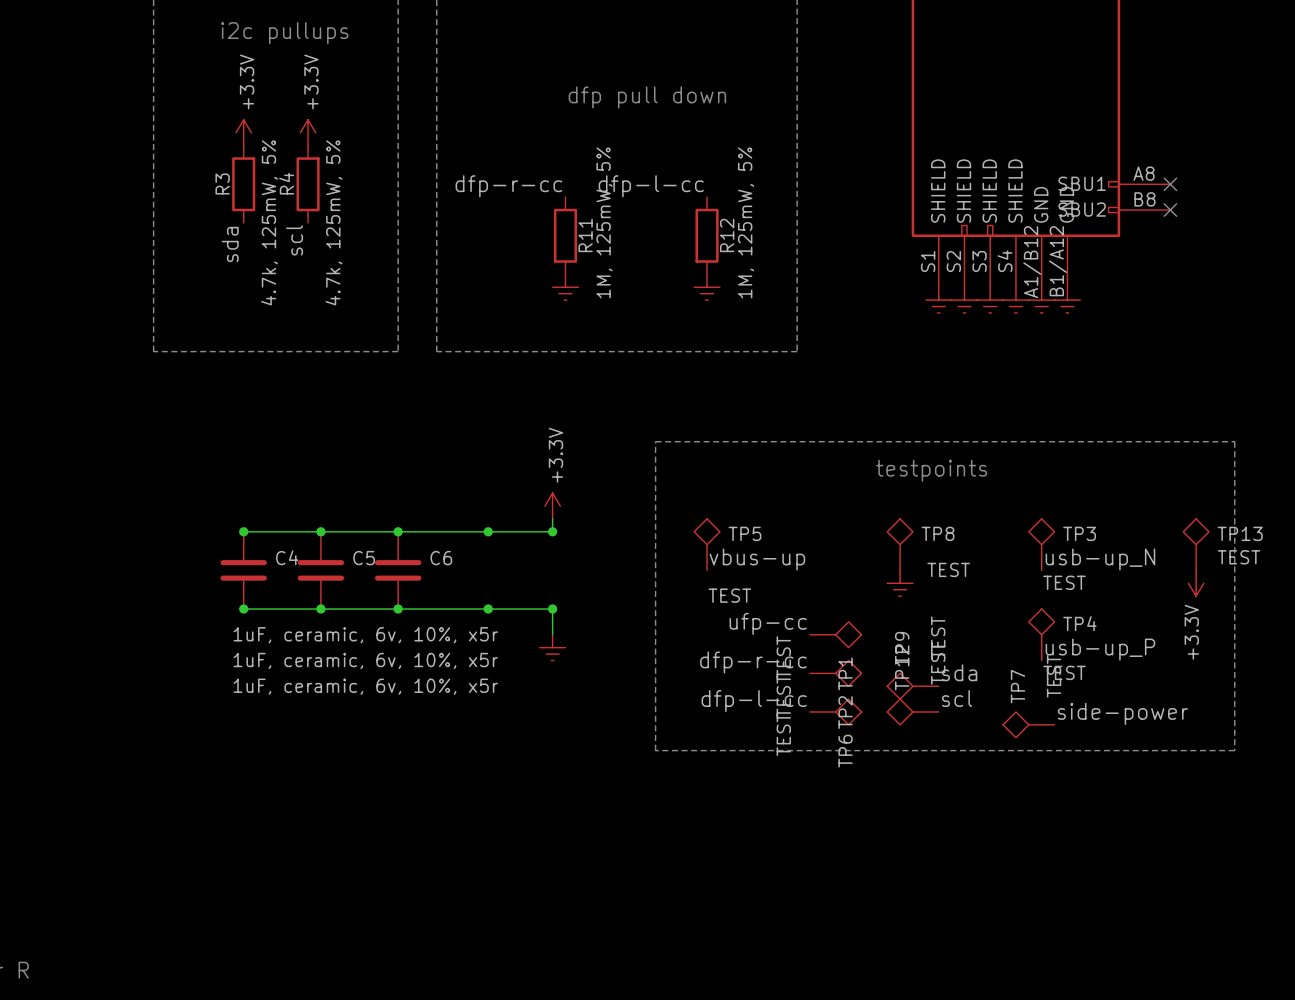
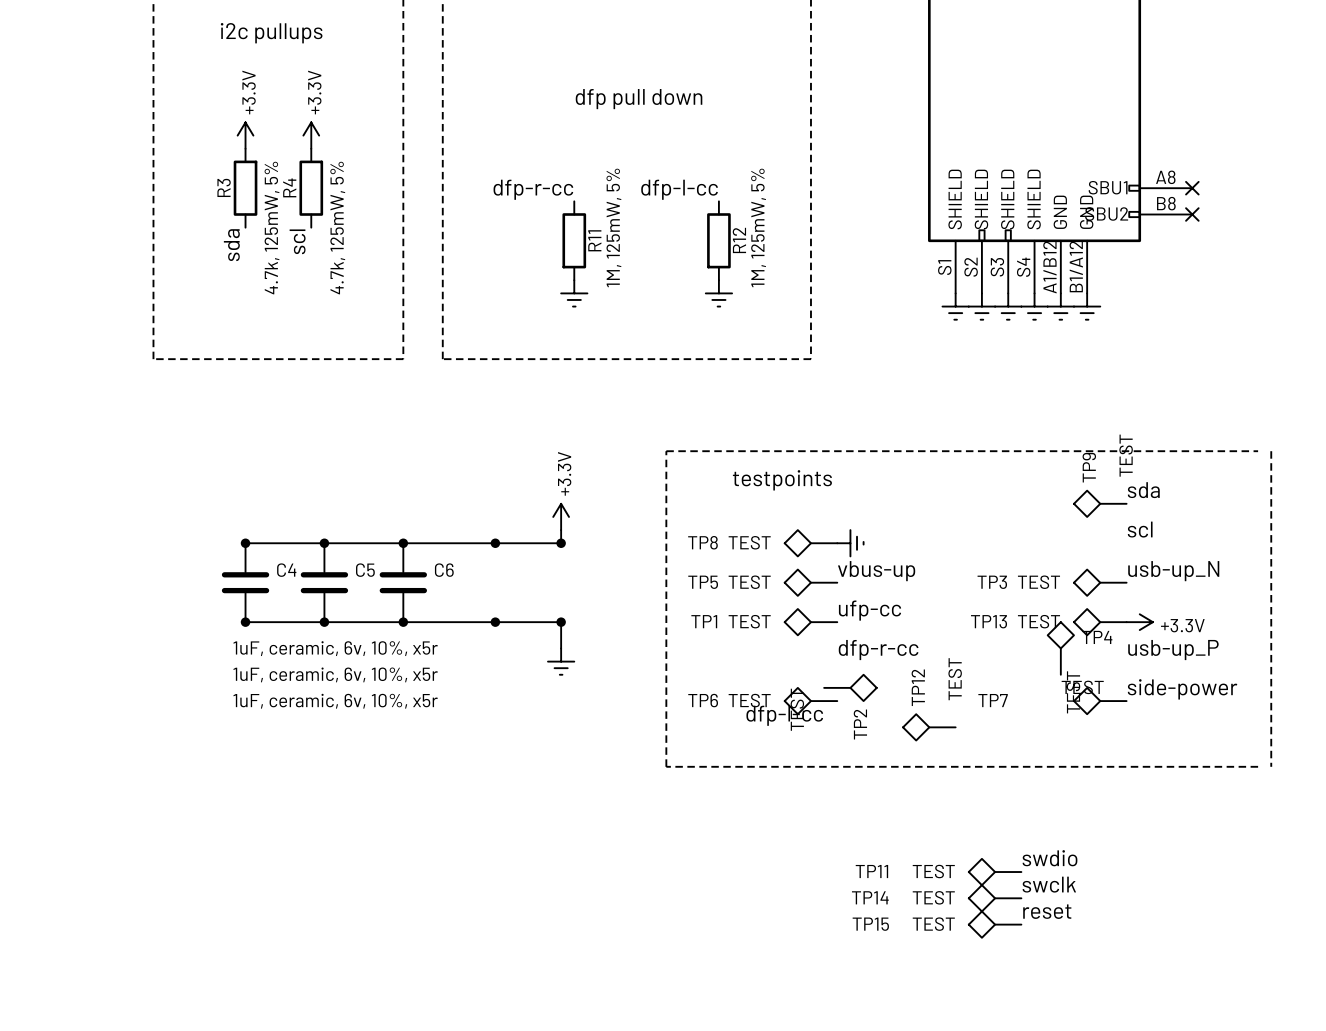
line: (1234, 441) (1234, 750) -> (1271, 451) (1271, 766)
text position: testpoints (931, 470) -> testpoints (782, 480)
label: none -> sda (1143, 490)
TP5 rotation: 0° (707, 531) -> 90° counterclockwise (797, 582)
TP8 rotation: 0° (900, 531) -> 90° counterclockwise (797, 543)
TP3 rotation: 0° (1041, 531) -> 90° counterclockwise (1087, 582)
TP13 rotation: 0° (1196, 531) -> 90° counterclockwise (1087, 622)
TP5 name position: TP5 (745, 533) -> TP5 (703, 582)
TP8 name position: TP8 (938, 533) -> TP8 (702, 542)
TP3 name position: TP3 (1079, 533) -> TP3 (992, 582)
TP13 name position: TP13 (1240, 533) -> TP13 (989, 621)
TP5 position: (707, 544) -> (810, 582)
TP8 position: (900, 544) -> (810, 543)
TP3 position: (1041, 544) -> (1100, 582)
TP13 position: (1196, 544) -> (1100, 622)
TP13 value position: TEST (1238, 557) -> TEST (1038, 621)
label position: vbus-up (757, 559) -> vbus-up (876, 571)
label position: usb-up_N (1100, 559) -> usb-up_N (1173, 571)
TP8 value position: TEST (948, 569) -> TEST (749, 542)
TP3 value position: TEST (1064, 582) -> TEST (1038, 582)
power symbol rotation: 0° (900, 583) -> 90° counterclockwise (850, 543)
power symbol position: (900, 583) -> (850, 543)
power symbol rotation: 0° (1196, 583) -> 90° counterclockwise (1139, 622)
power symbol position: +3.3V (1196, 583) -> +3.3V (1139, 622)
TP5 value position: TEST (729, 595) -> TEST (749, 582)
label position: ufp-cc (768, 623) -> ufp-cc (870, 610)
TP1 position: (835, 634) -> (810, 622)
TP1 rotation: 0° (848, 634) -> 180° (797, 622)
label position: usb-up_P (1100, 649) -> usb-up_P (1173, 650)
TP1 value position: TEST (783, 657) -> TEST (749, 621)
label position: dfp-r-cc (753, 662) -> dfp-r-cc (878, 650)
label: sda (959, 672) -> none
TP1 name position: TP1 (845, 673) -> TP1 (704, 621)
TP9 position: (912, 686) -> (1100, 503)
TP7 name rotation: 0° (1018, 686) -> 90° clockwise (993, 700)
TP7 name position: TP7 (1018, 686) -> TP7 (993, 700)
label position: scl (957, 698) -> scl (1140, 529)
TP6 position: (835, 711) -> (810, 701)
TP6 rotation: 0° (848, 711) -> 180° (797, 701)
label position: side-power (1122, 713) -> side-power (1182, 689)
TP7 position: (1028, 724) -> (1100, 701)
TP6 value position: TEST (783, 734) -> TEST (749, 700)
TP6 name position: TP6 (845, 751) -> TP6 (703, 700)
label: none -> swdio (1050, 858)
TP11: none -> TEST (995, 872)
label: none -> swclk (1049, 884)
TP14: none -> TEST (995, 898)
label: none -> reset (1047, 911)
TP15: none -> TEST (995, 924)

